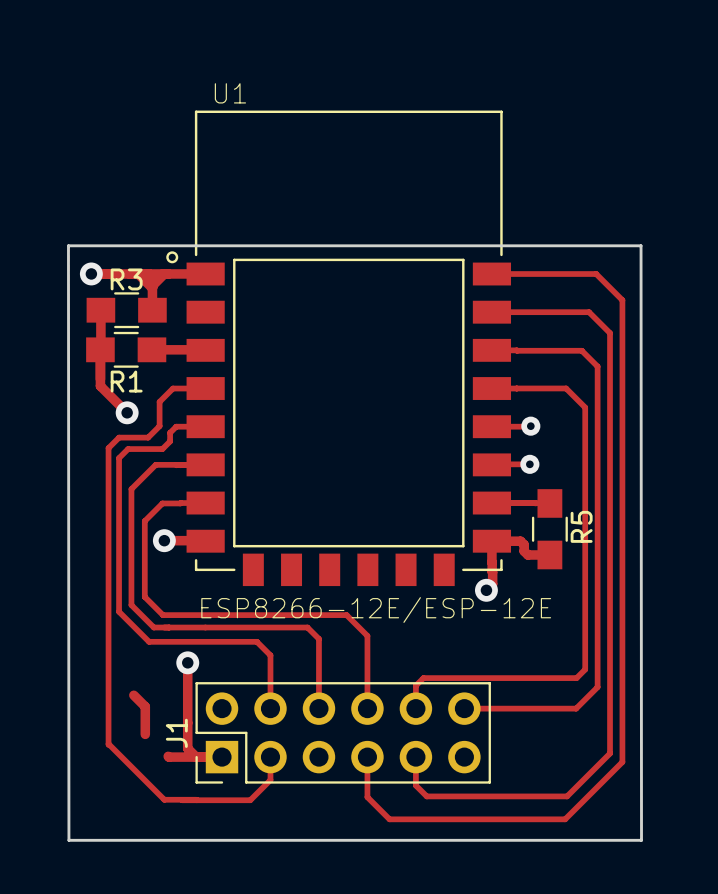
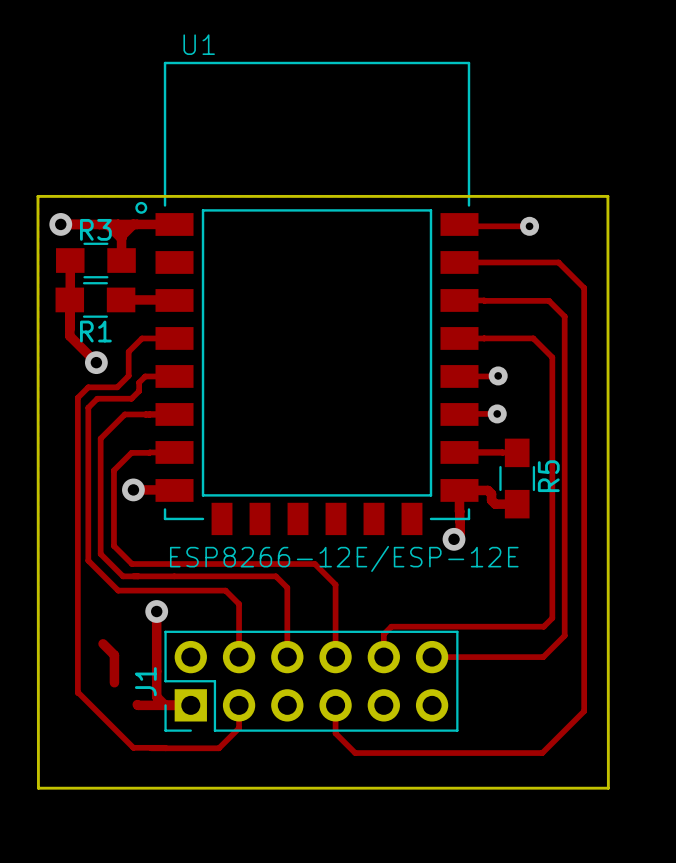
track: (491, 274) (596, 274) (622, 300) (622, 762) (565, 819) (389, 819) (367, 797) (367, 785) -> (459, 224) (461, 226) (529, 226)
via: none -> (529, 226)
track: (589, 312) (610, 333) (610, 753) (567, 796) (426, 796) (415, 785) (415, 757) -> (556, 262) (558, 262) (584, 288) (584, 711) (542, 753) (355, 753) (335, 733)

